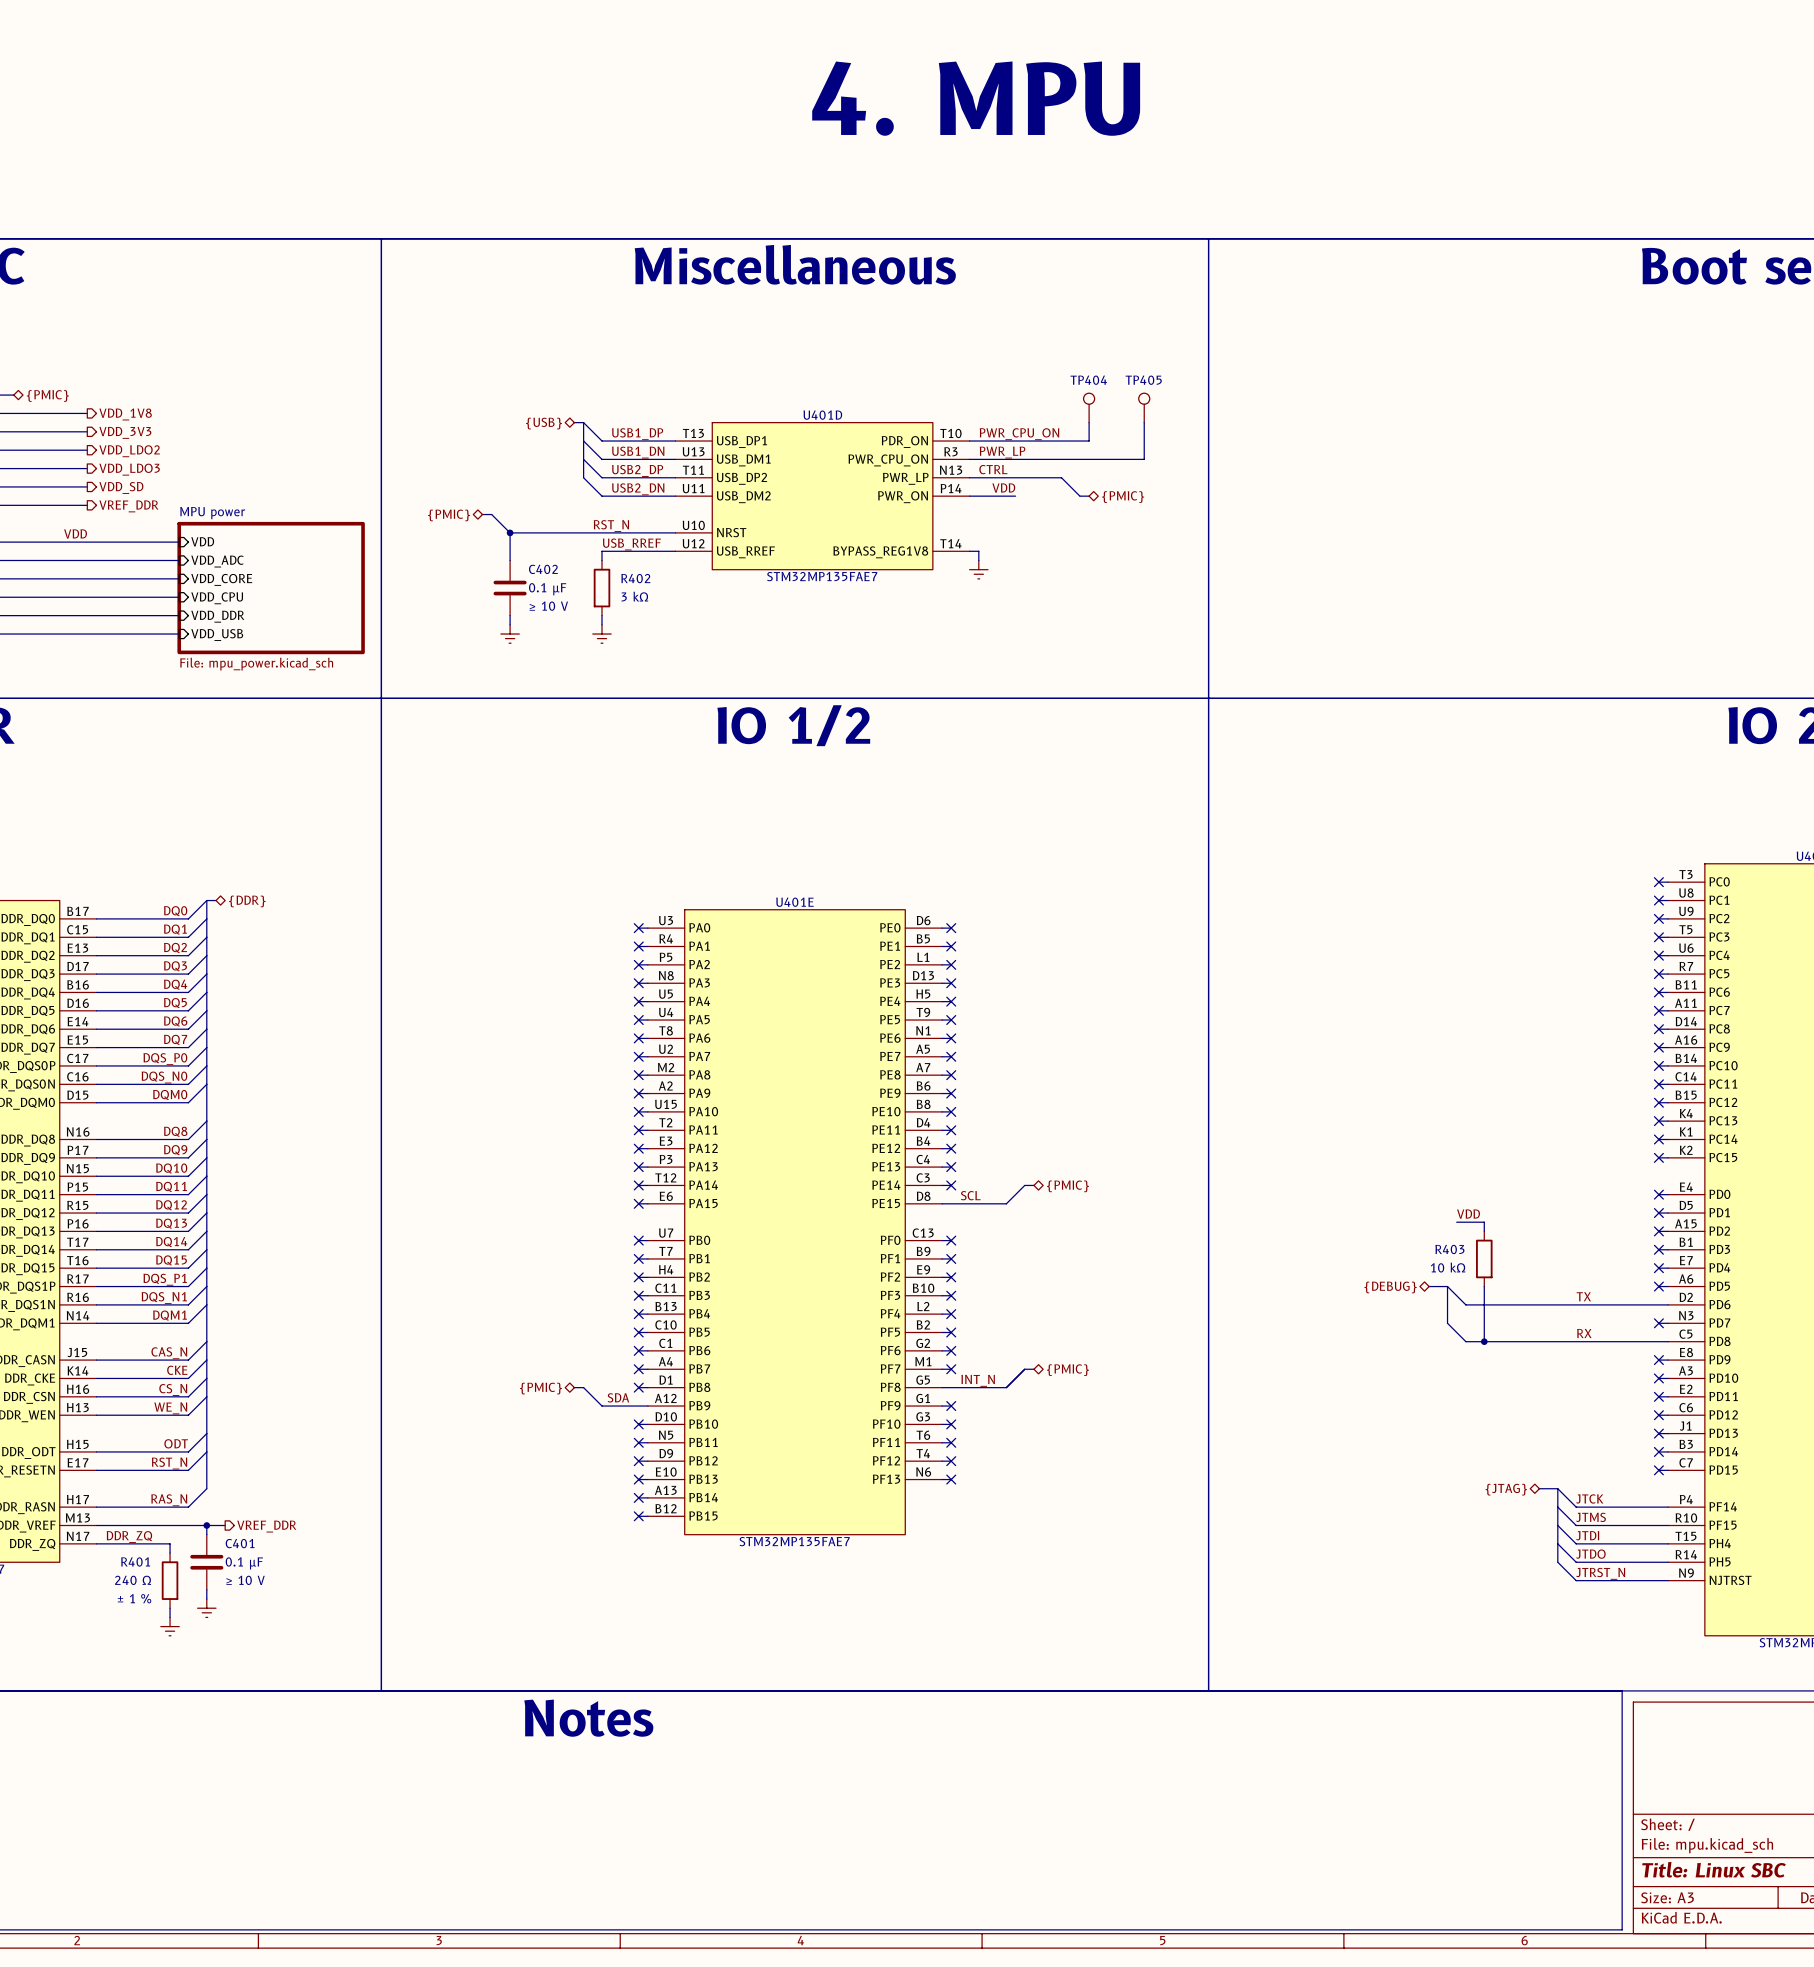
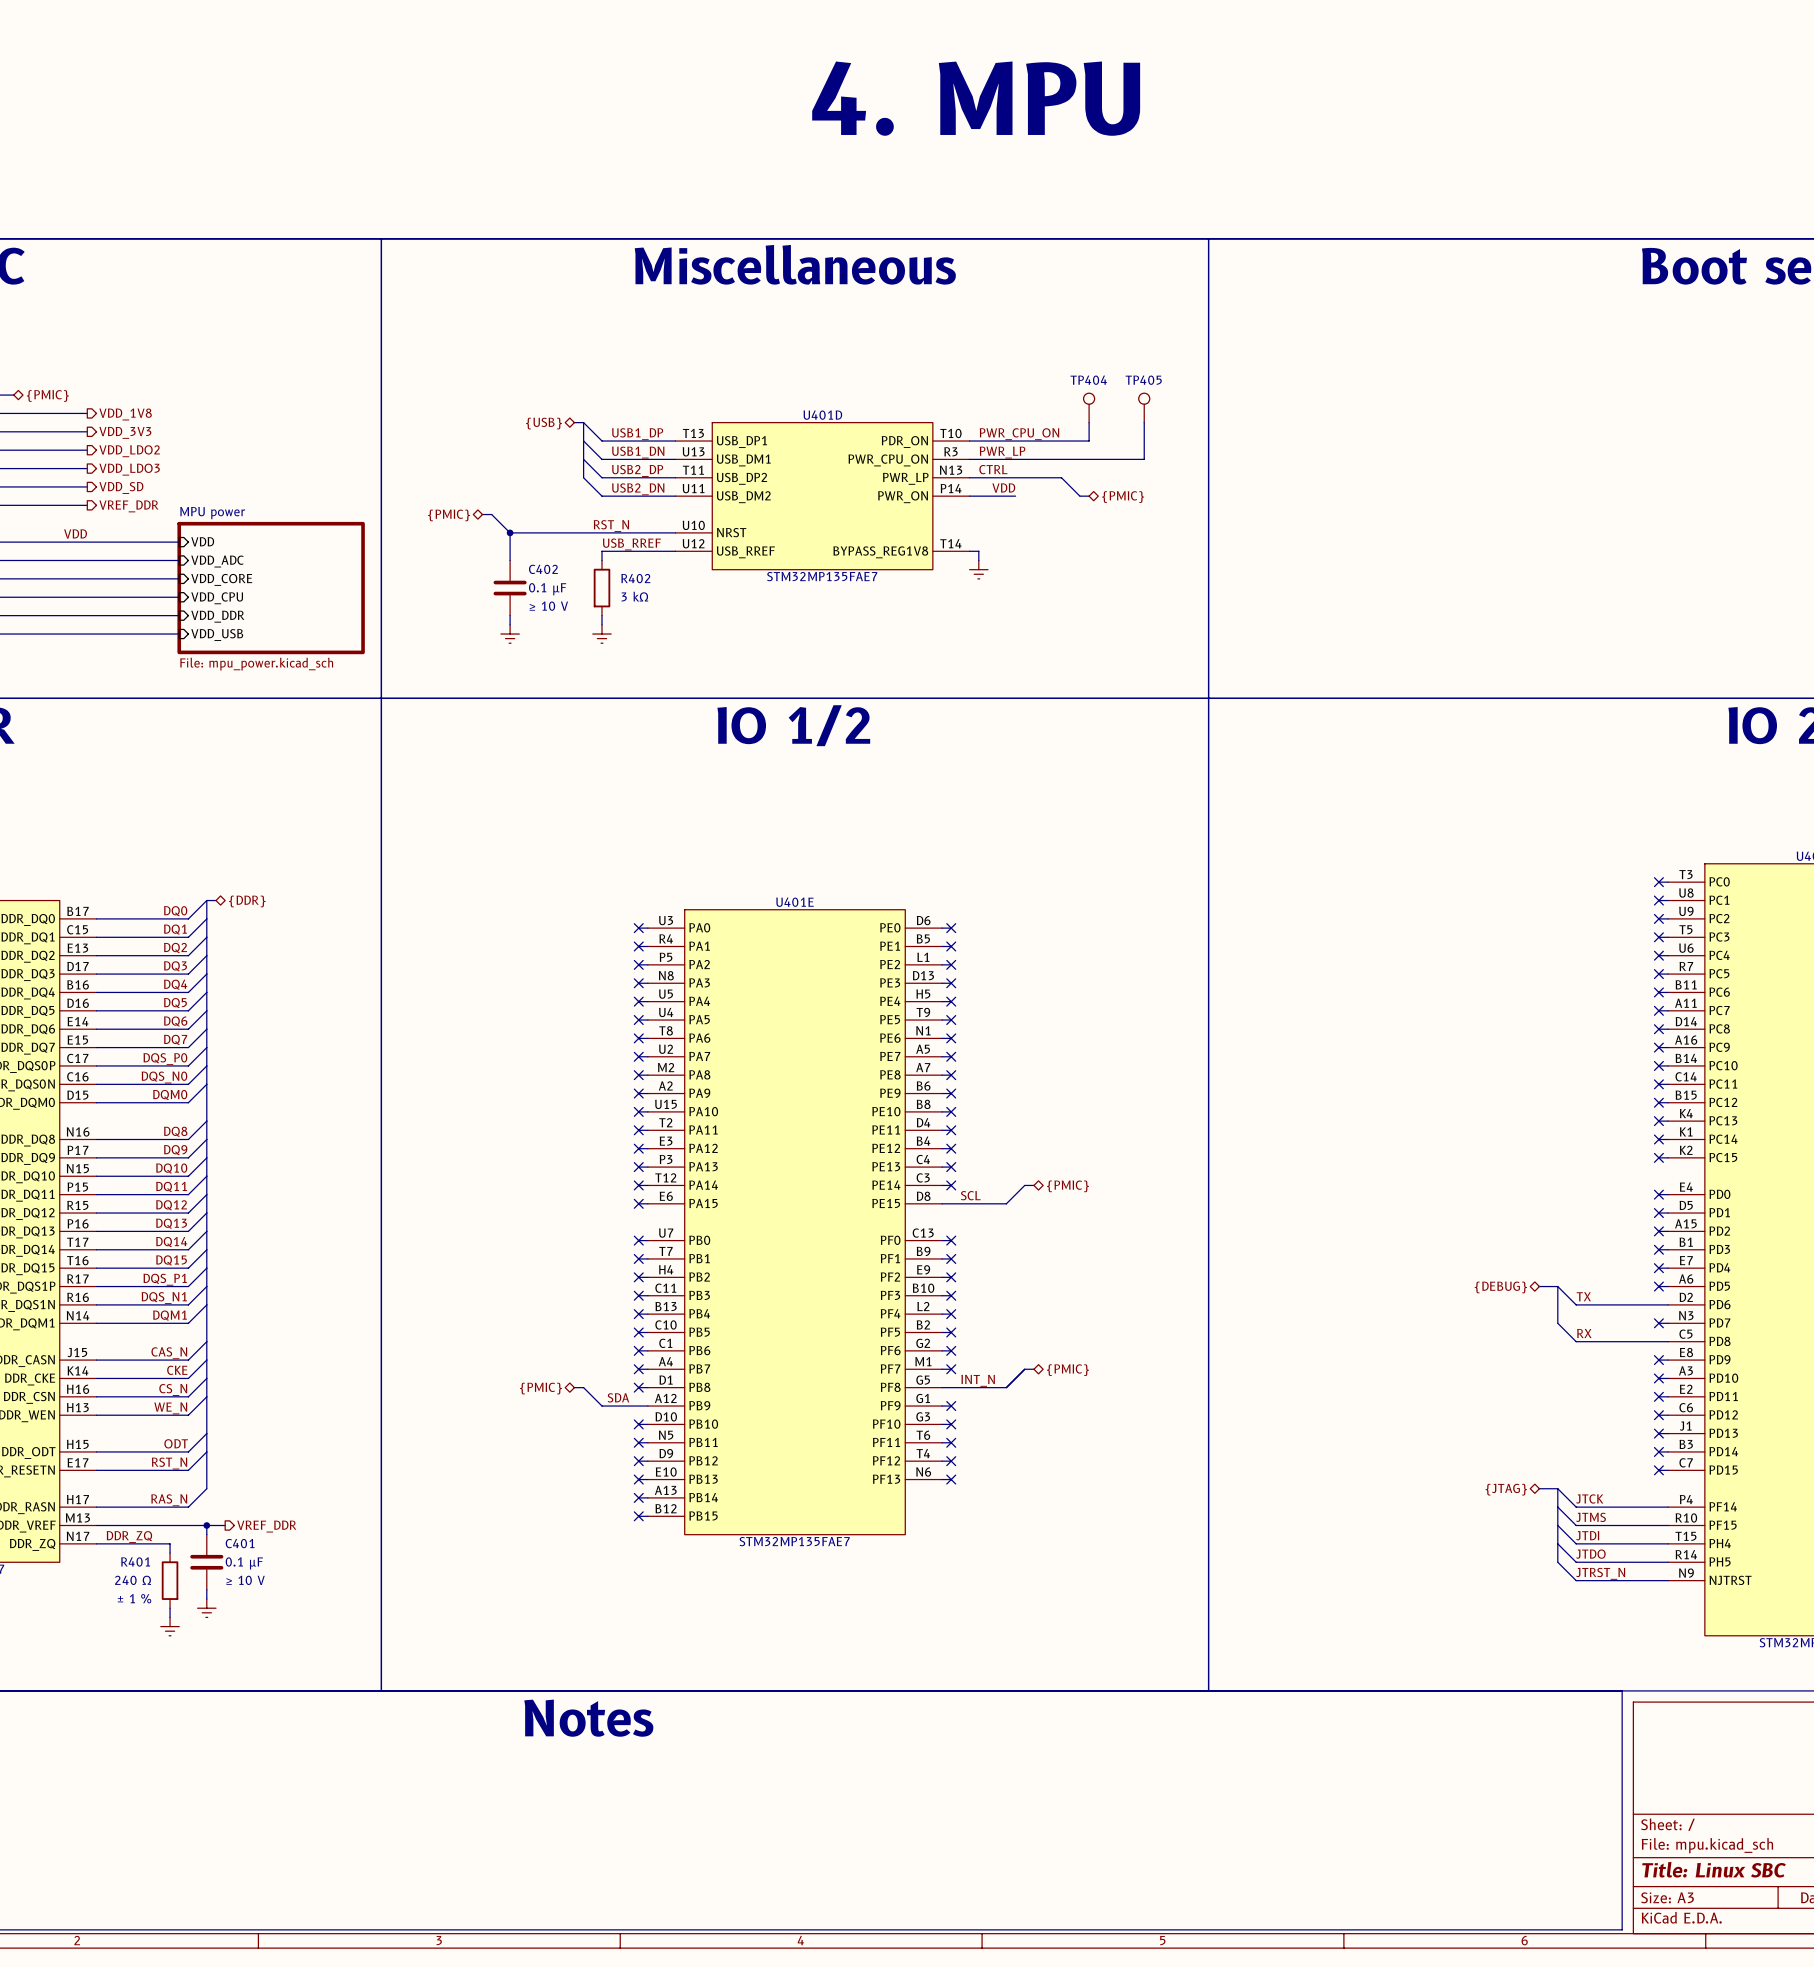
label: VDD (1468, 1214) -> none
wire: (1456, 1222) (1484, 1222) (1484, 1231) -> none
R403: 10 kΩ (1484, 1258) -> none
bus: (1429, 1286) (1447, 1286) (1447, 1323) -> (1539, 1286) (1557, 1286) (1557, 1323)
wire: (1447, 1286) (1465, 1304) (1576, 1304) -> (1557, 1286) (1576, 1304)
wire: (1484, 1286) (1484, 1341) -> none
hierarchical label position: {DEBUG} (1390, 1287) -> {DEBUG} (1500, 1287)
wire: (1447, 1323) (1465, 1341) (1576, 1341) -> (1557, 1323) (1576, 1341)
junction: (1484, 1341) -> none

